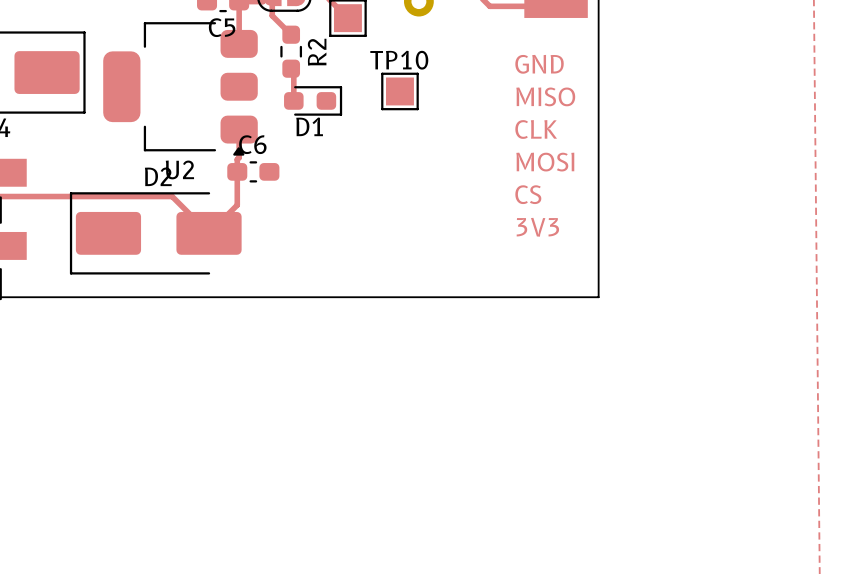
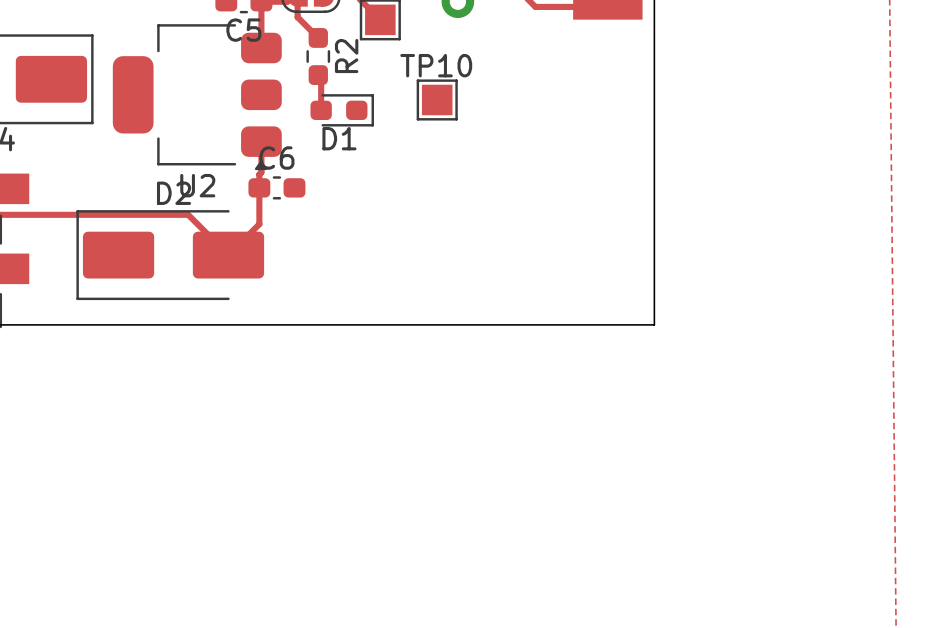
text: GND (539, 64) -> none
text: MISO (545, 96) -> none
text: CLK (536, 129) -> none
text: MOSI (545, 162) -> none
text: CS (528, 194) -> none
text: 3V3 (537, 227) -> none

